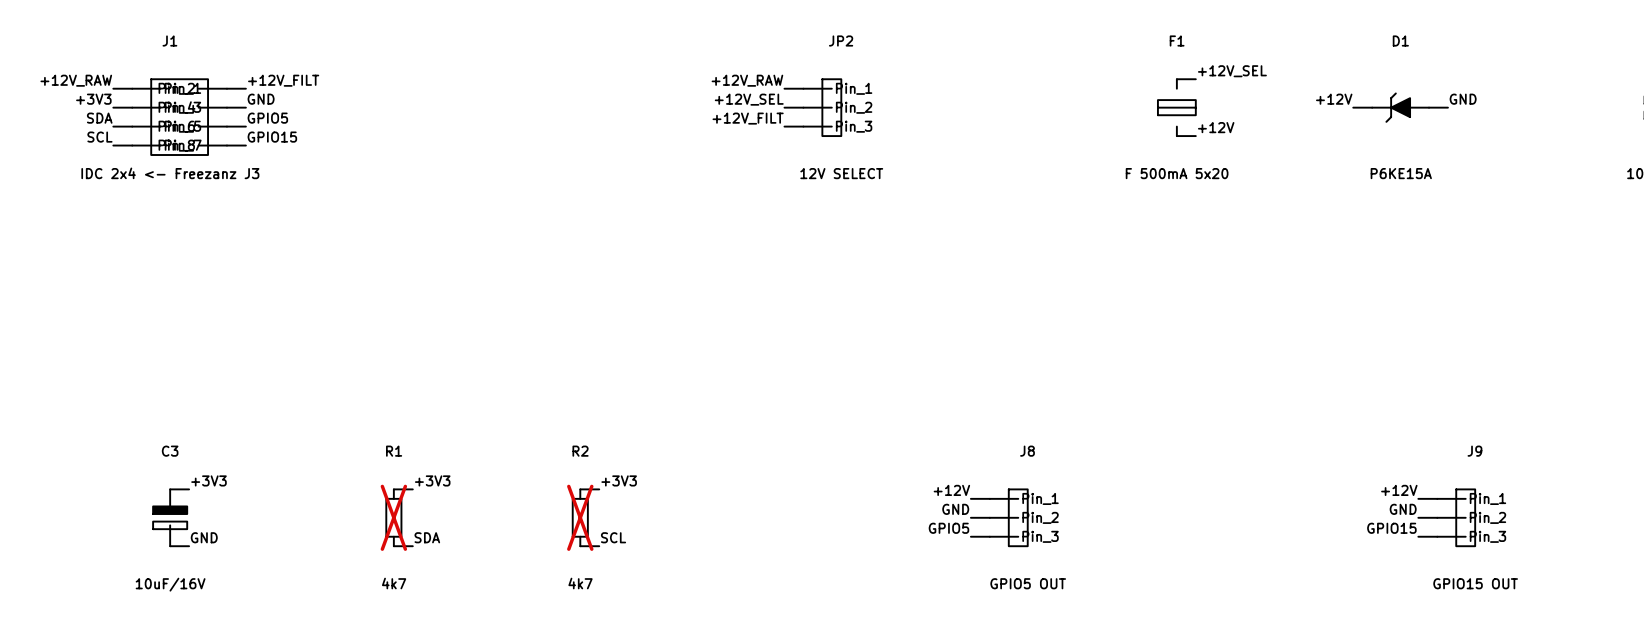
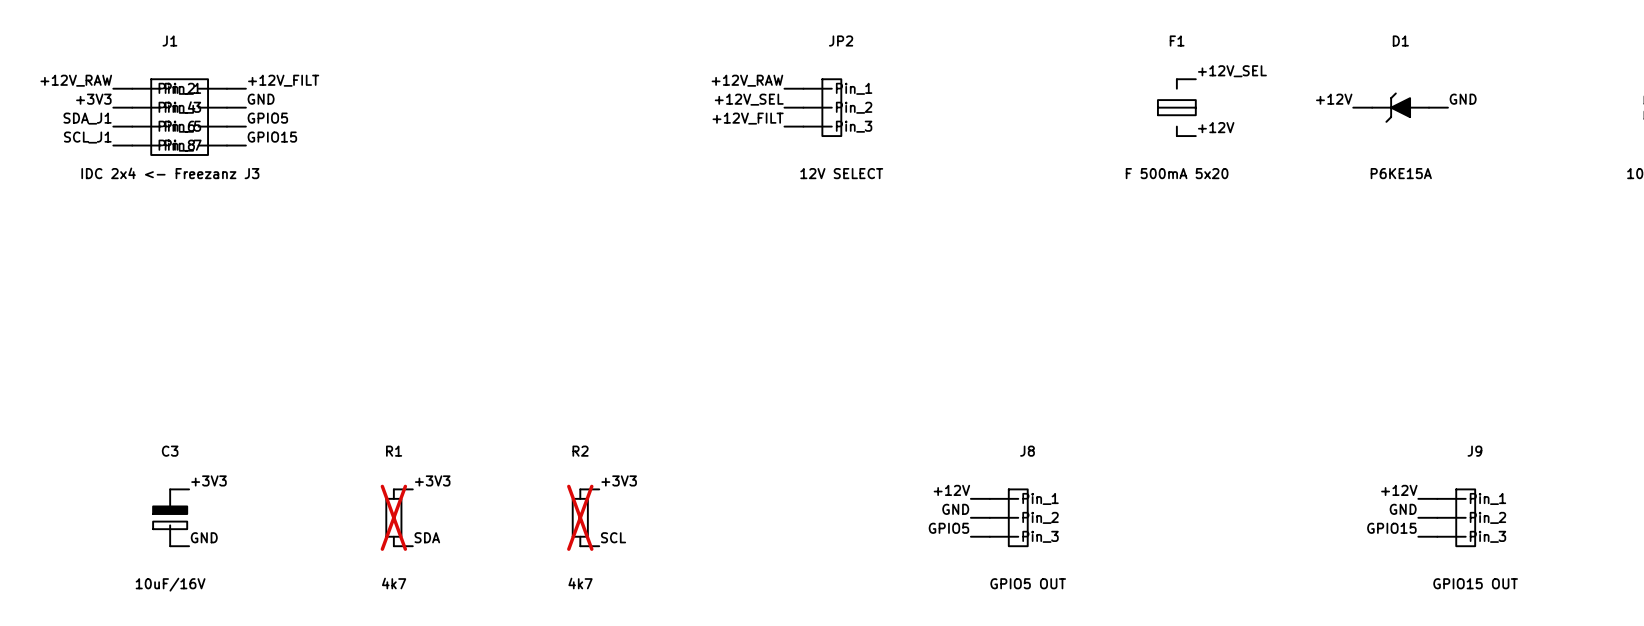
label: SDA (99, 118) -> SDA_J1 (87, 118)
label: SCL (99, 137) -> SCL_J1 (87, 137)

